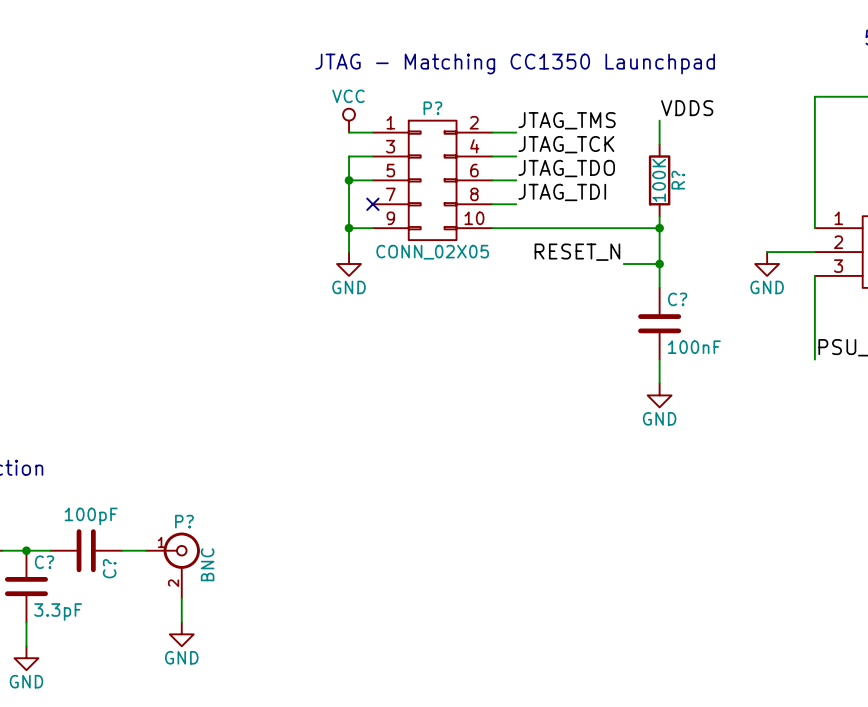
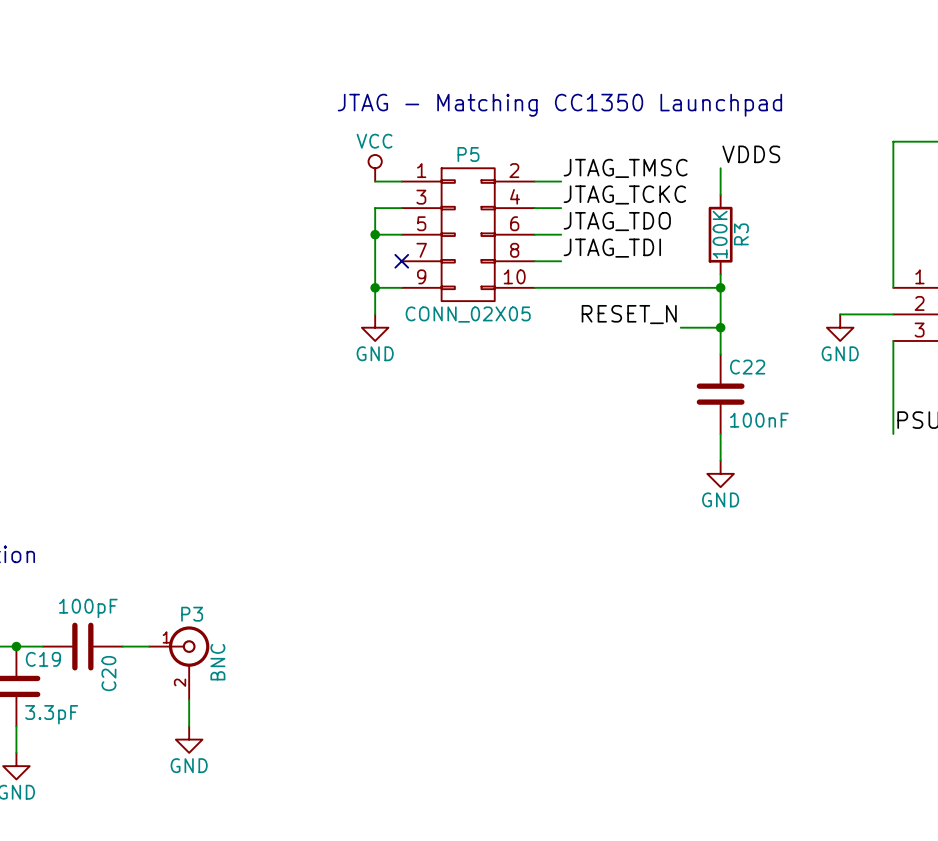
P? name: P? (432, 108) -> P5 (468, 154)
label: JTAG_TMS (567, 120) -> JTAG_TMSC (625, 168)
label: JTAG_TCK (566, 144) -> JTAG_TCKC (624, 194)
R? name: R? (678, 180) -> R3 (741, 234)
C? name: C? (677, 299) -> C22 (747, 367)
P? name: P? (184, 521) -> P3 (192, 614)
C? name: C? (44, 562) -> C19 (43, 659)
C? name: C? (109, 568) -> C20 (108, 673)

